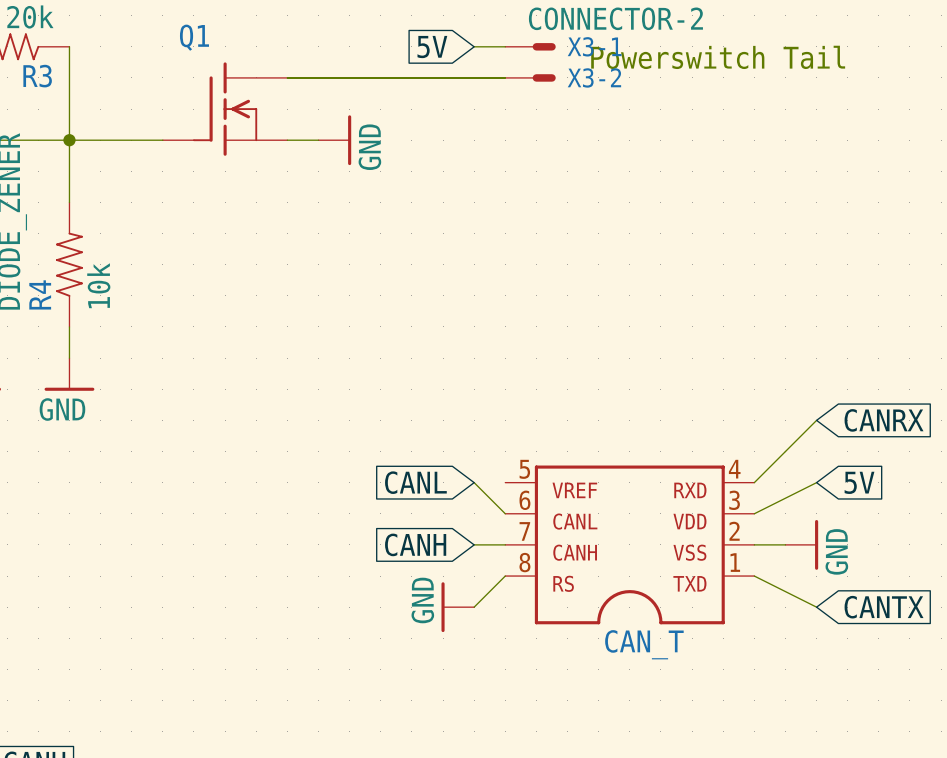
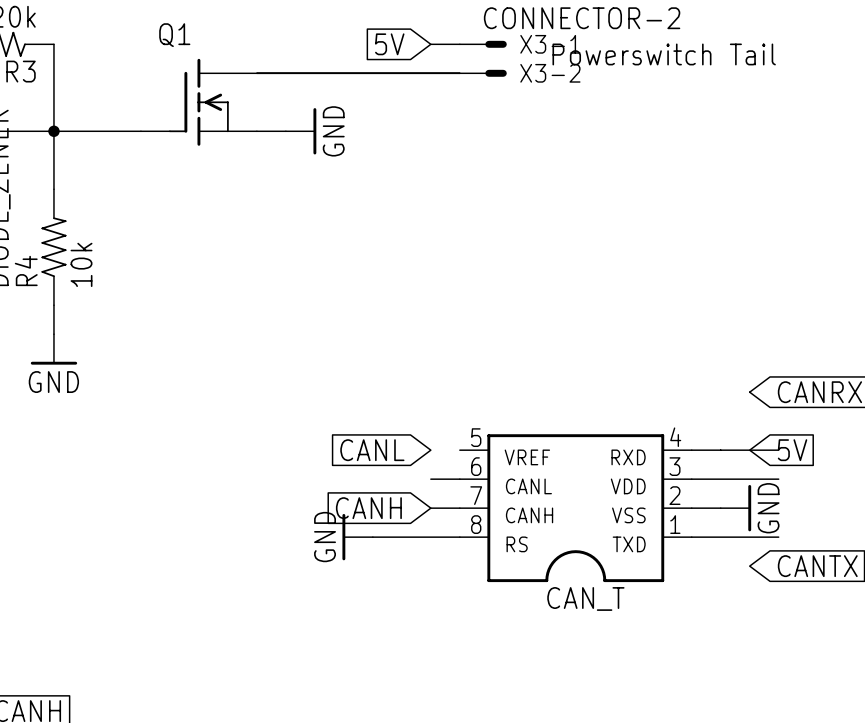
wire: (816, 420) (754, 482) -> (778, 450) (691, 450)
wire: (474, 482) (505, 513) -> (430, 479) (459, 479)
wire: (816, 482) (754, 513) -> (778, 479) (691, 479)
wire: (505, 576) (474, 607) -> (459, 537) (372, 537)
wire: (754, 576) (816, 607) -> (691, 537) (778, 537)
power symbol position: GND (457, 607) -> GND (357, 537)

